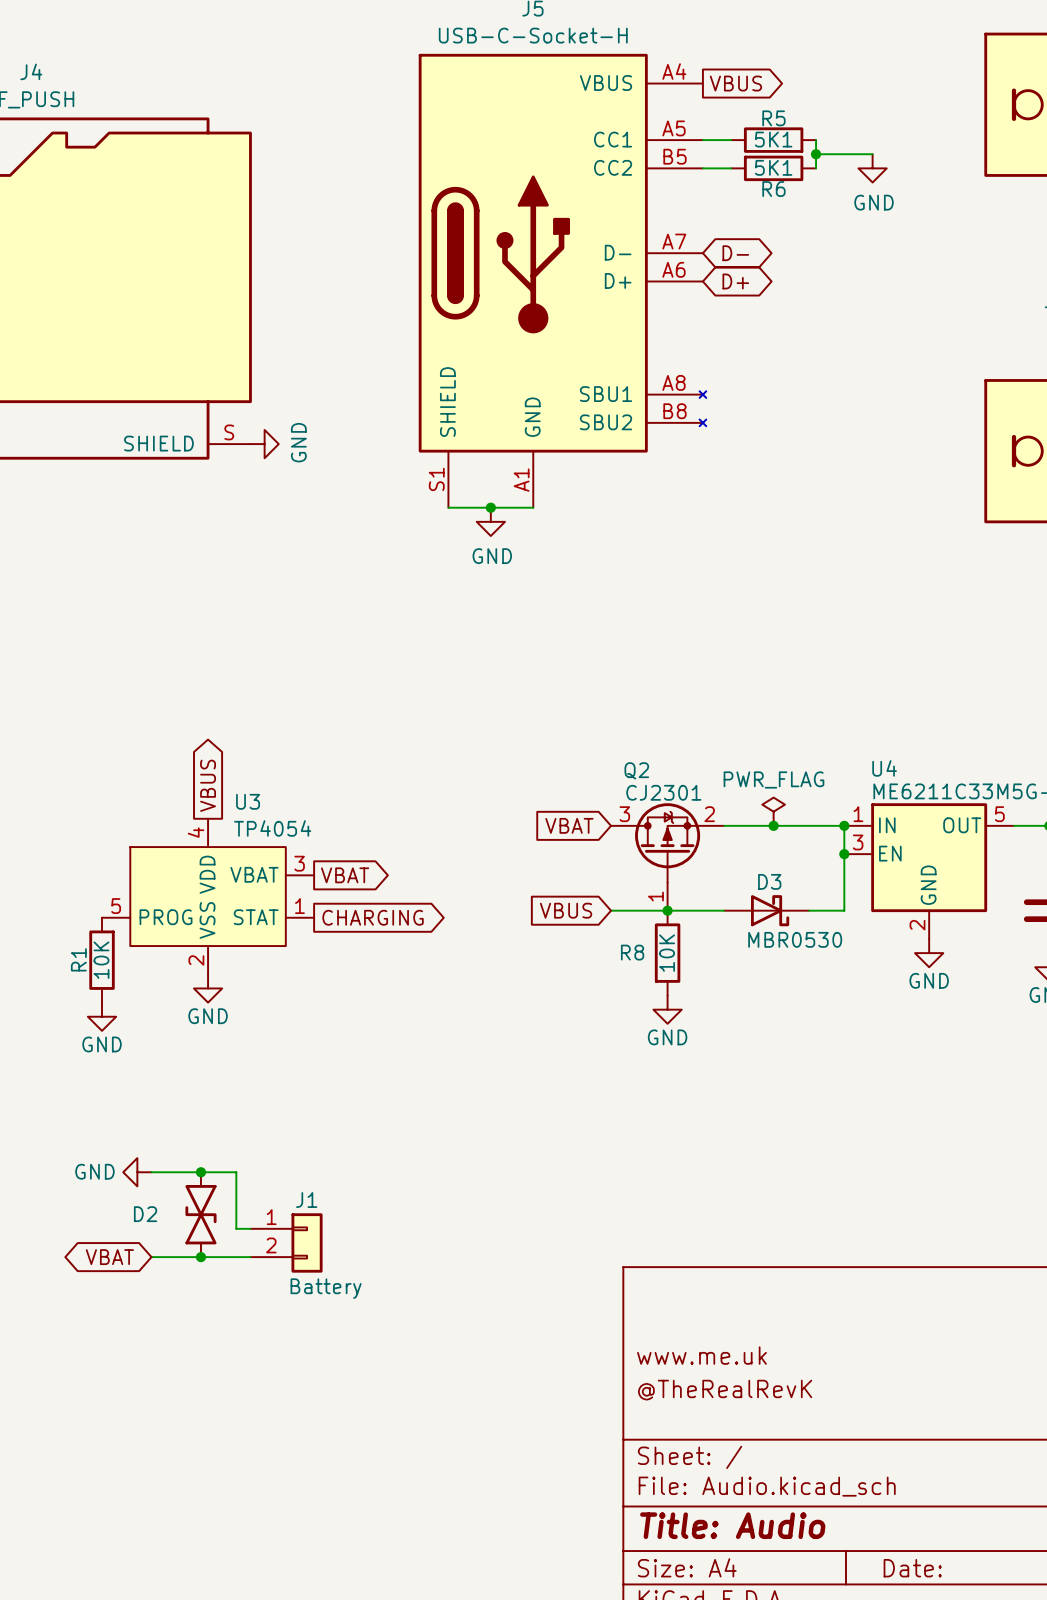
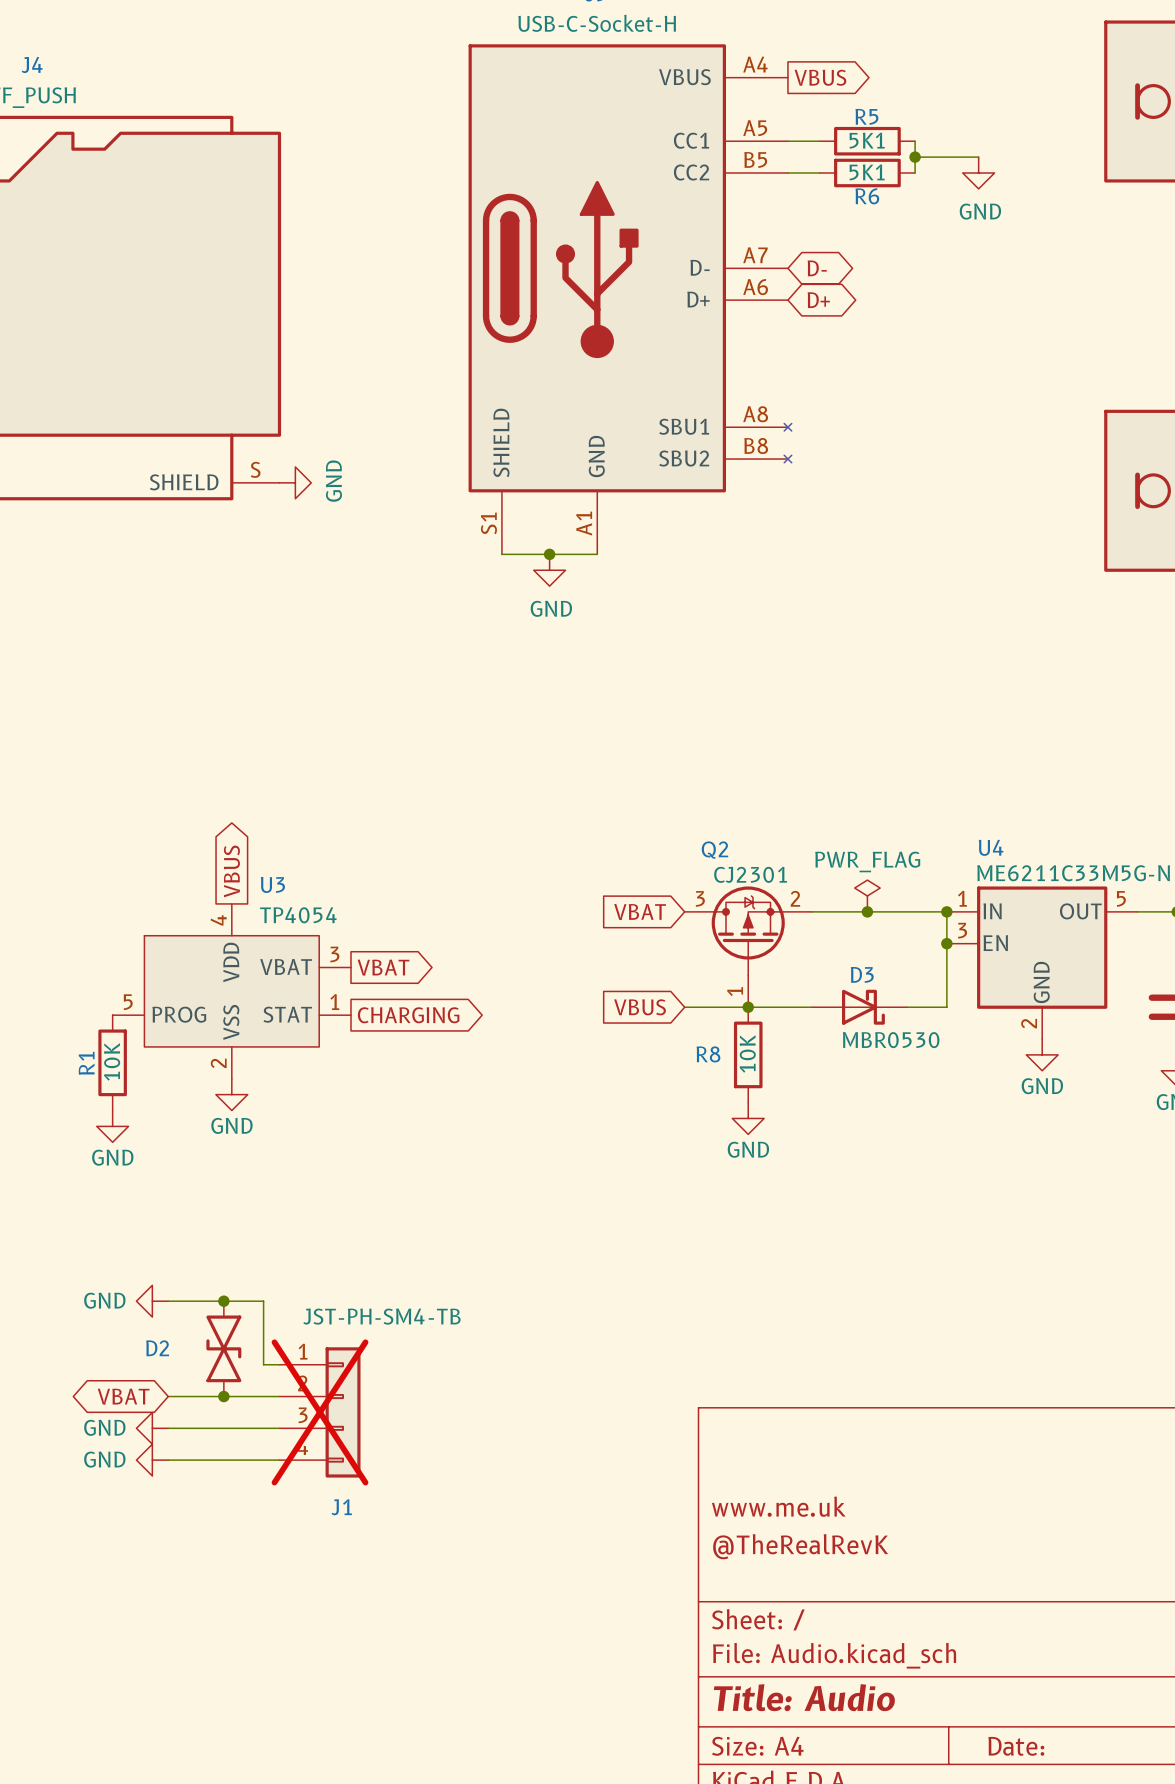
J1 name position: J1 (306, 1200) -> J1 (341, 1507)
J1 symbol: [250, 1213, 323, 1273] -> [279, 1347, 361, 1478]
J1 do-not-place cross: none -> (320, 1412)
power symbol: none -> GND (152, 1428)
wire: none -> (168, 1428) (279, 1428)
J1 value: Battery (326, 1288) -> JST-PH-SM4-TB (381, 1316)
power symbol: none -> GND (152, 1460)
wire: none -> (168, 1460) (279, 1460)

